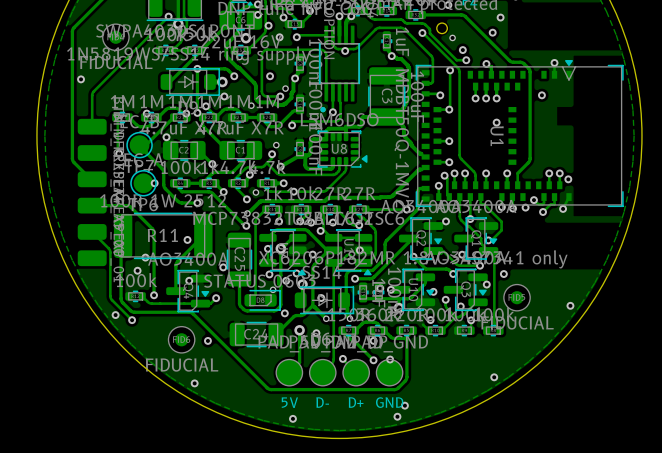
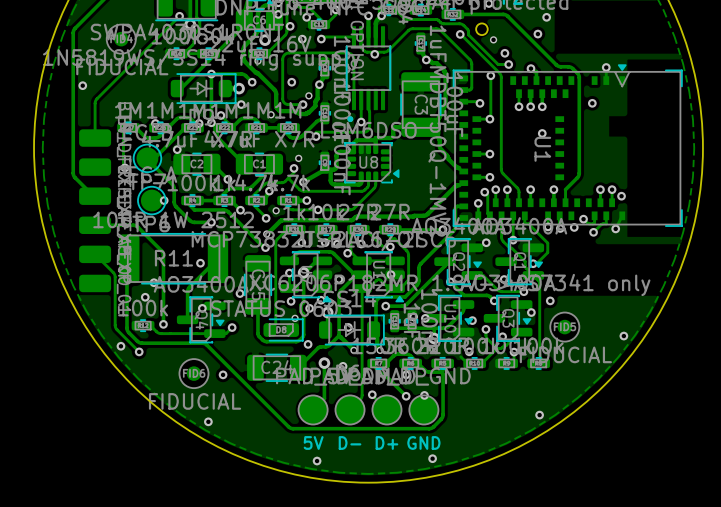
via: (404, 405) -> none

